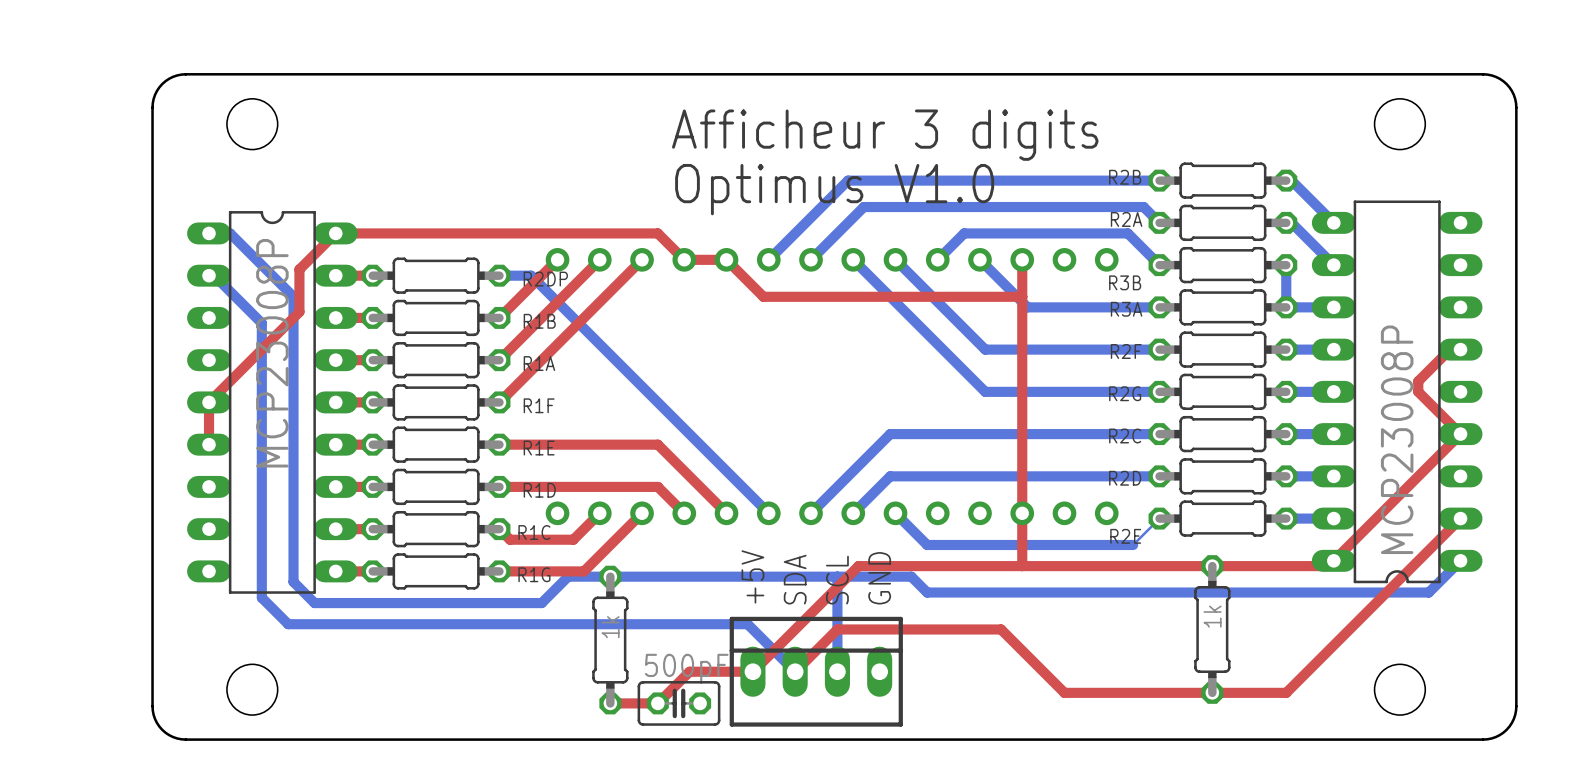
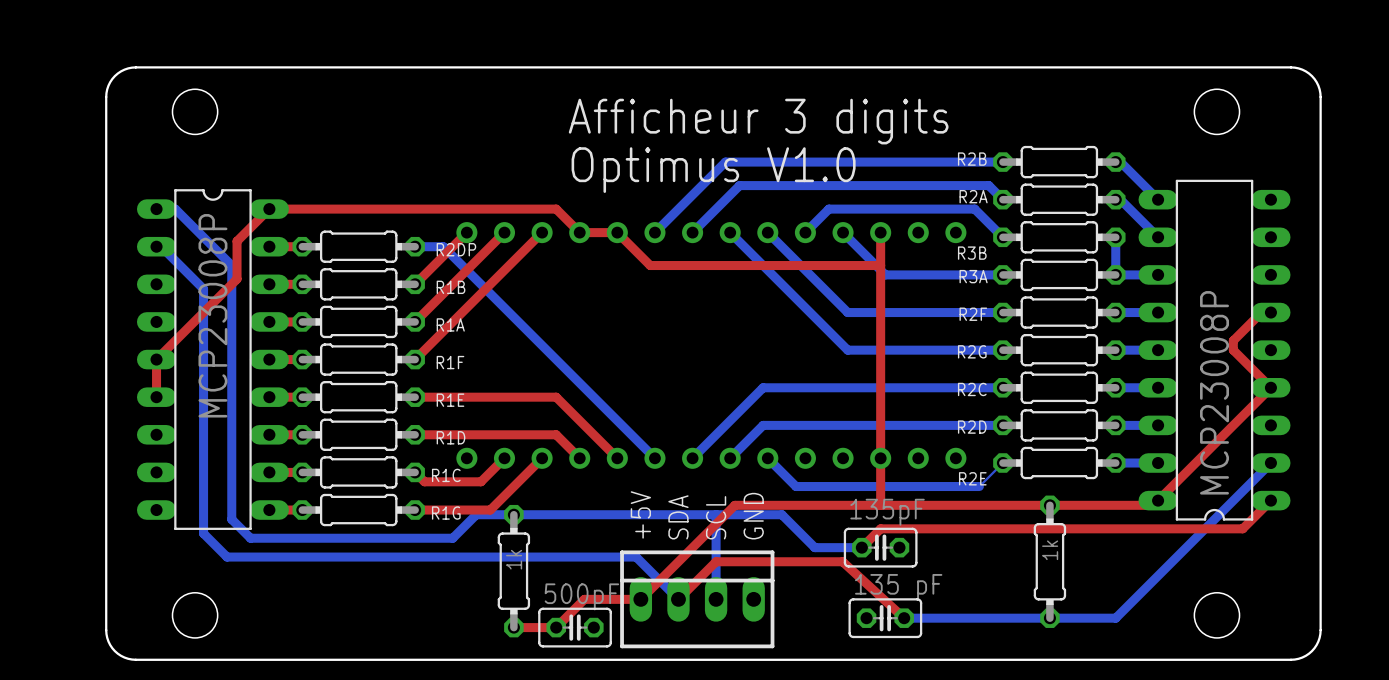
top track: (1460, 518) (1286, 692) (1064, 692) (1001, 629) (979, 629) -> (904, 618) (842, 561)
bottom track: none -> (1270, 463) (1115, 618) (904, 618)
top track: none -> (1270, 500) (1242, 528) (880, 528) (861, 547)
bottom track: (1460, 560) (1428, 592) (927, 592) -> (861, 547) (814, 547) (796, 528)
part: none -> 135pF (880, 547)
part: none -> 135 pF (885, 618)

